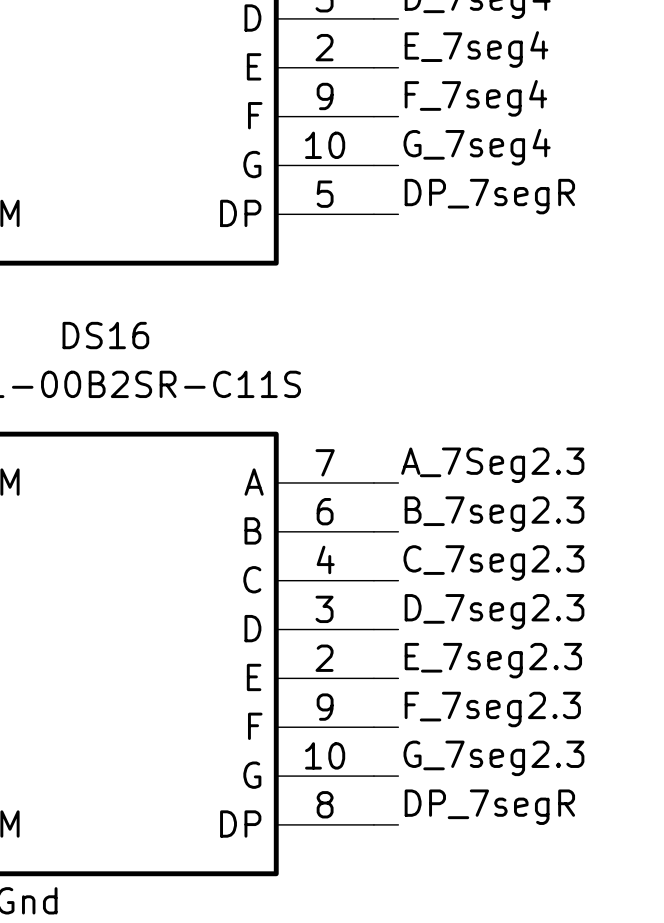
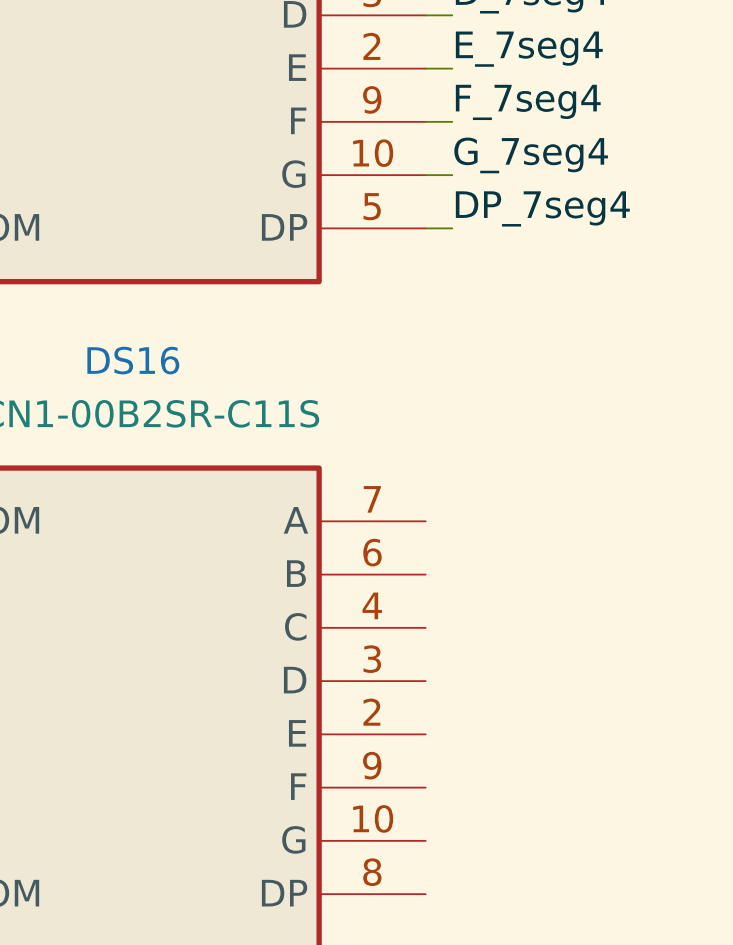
label: DP_7segR (489, 196) -> DP_7seg4 (542, 208)
label: A_7Seg2.3 (492, 465) -> none
wire: (373, 482) (398, 482) -> none
label: B_7seg2.3 (494, 514) -> none
wire: (373, 531) (398, 531) -> none
label: C_7seg2.3 (493, 562) -> none
wire: (373, 580) (398, 580) -> none
label: D_7seg2.3 (494, 611) -> none
wire: (373, 629) (398, 629) -> none
label: E_7seg2.3 (493, 660) -> none
wire: (373, 678) (398, 678) -> none
label: F_7seg2.3 (492, 709) -> none
wire: (373, 727) (398, 727) -> none
label: G_7seg2.3 (493, 758) -> none
wire: (373, 776) (398, 776) -> none
label: DP_7segR (489, 807) -> none
wire: (373, 824) (398, 824) -> none

